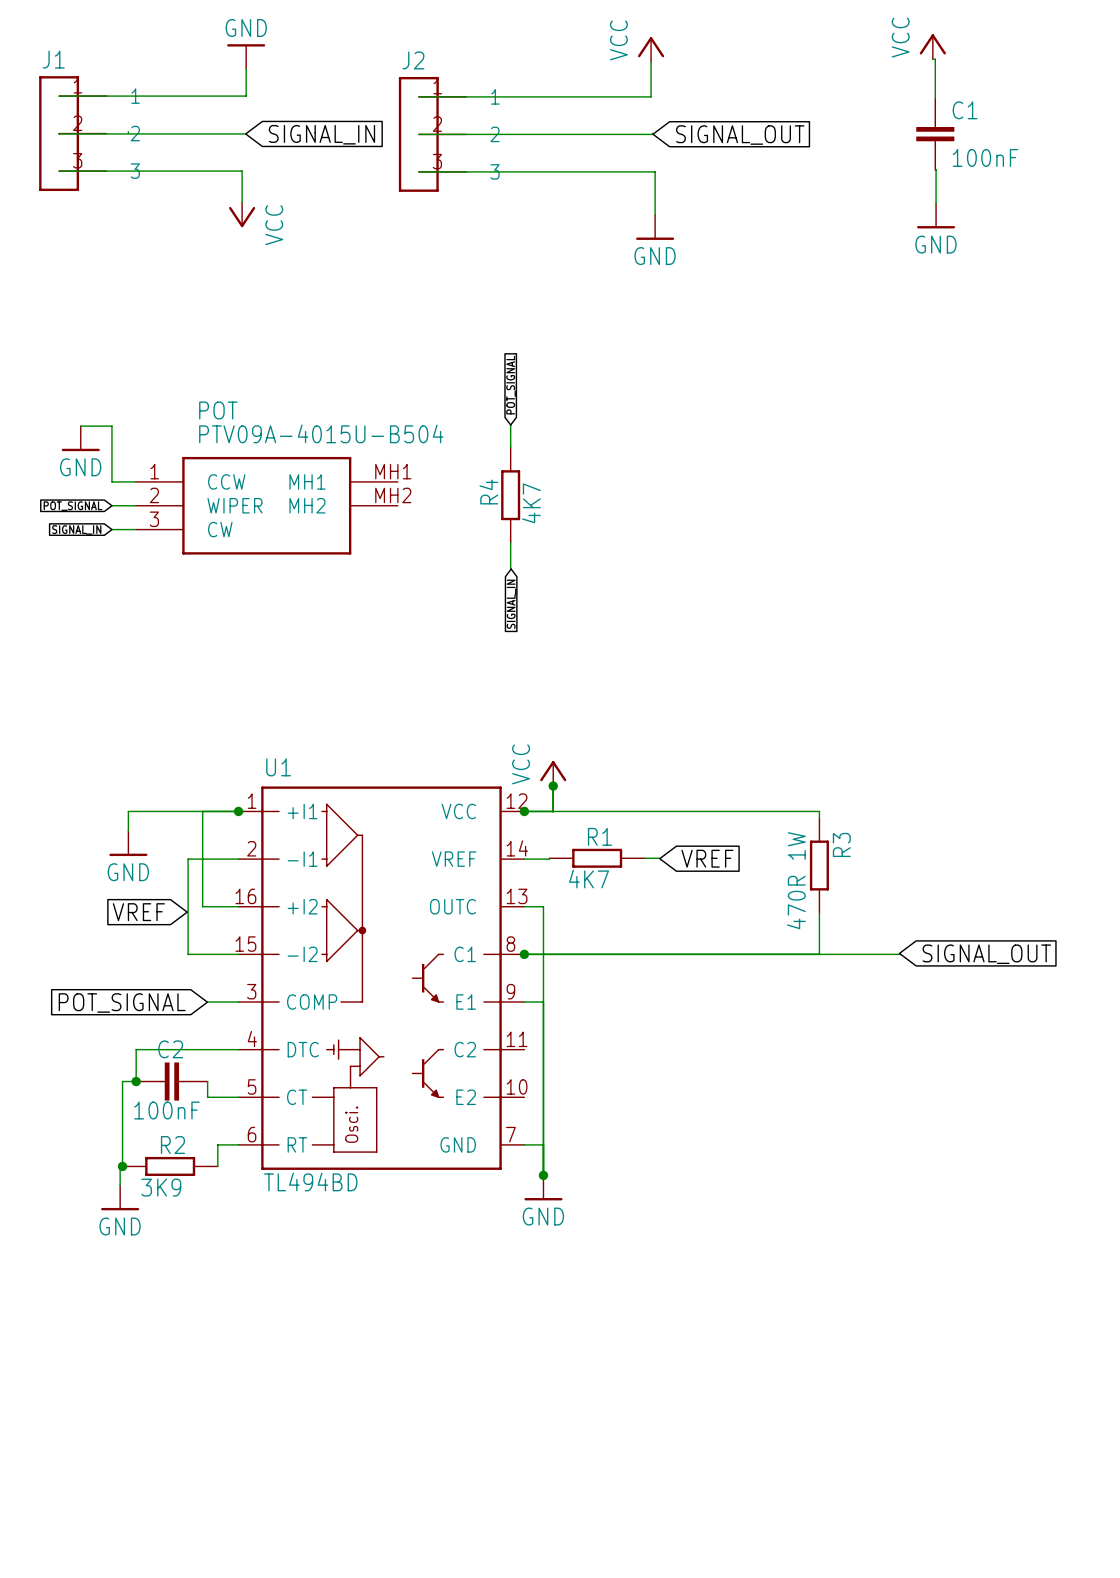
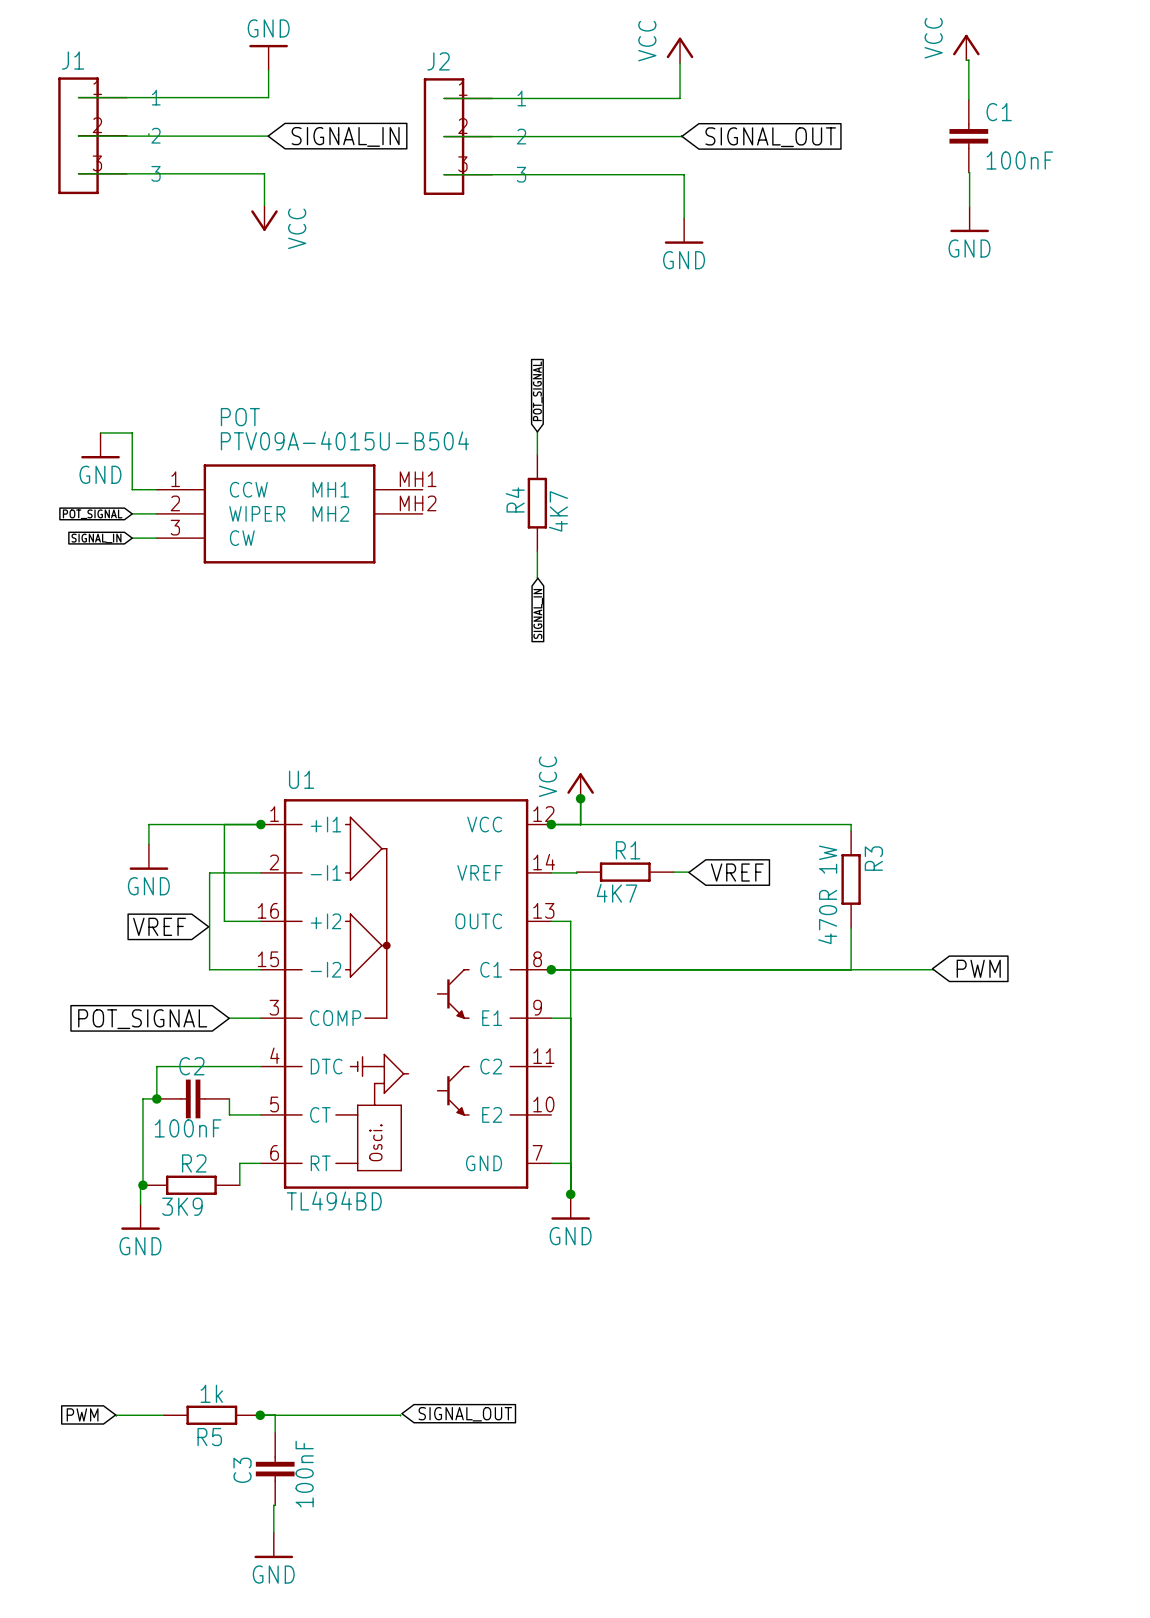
global label: SIGNAL_OUT (986, 954) -> PWM (978, 968)
global label: none -> SIGNAL_OUT (465, 1414)
global label: none -> PWM (82, 1414)
wire: none -> (163, 1415) (116, 1416)
R5: none -> 1k (211, 1415)
wire: none -> (260, 1415) (400, 1415)
junction: none -> (260, 1415)
wire: none -> (275, 1415) (275, 1432)
C3: none -> 100nF (275, 1469)
wire: none -> (275, 1505) (273, 1532)
power symbol: none -> GND (273, 1545)

